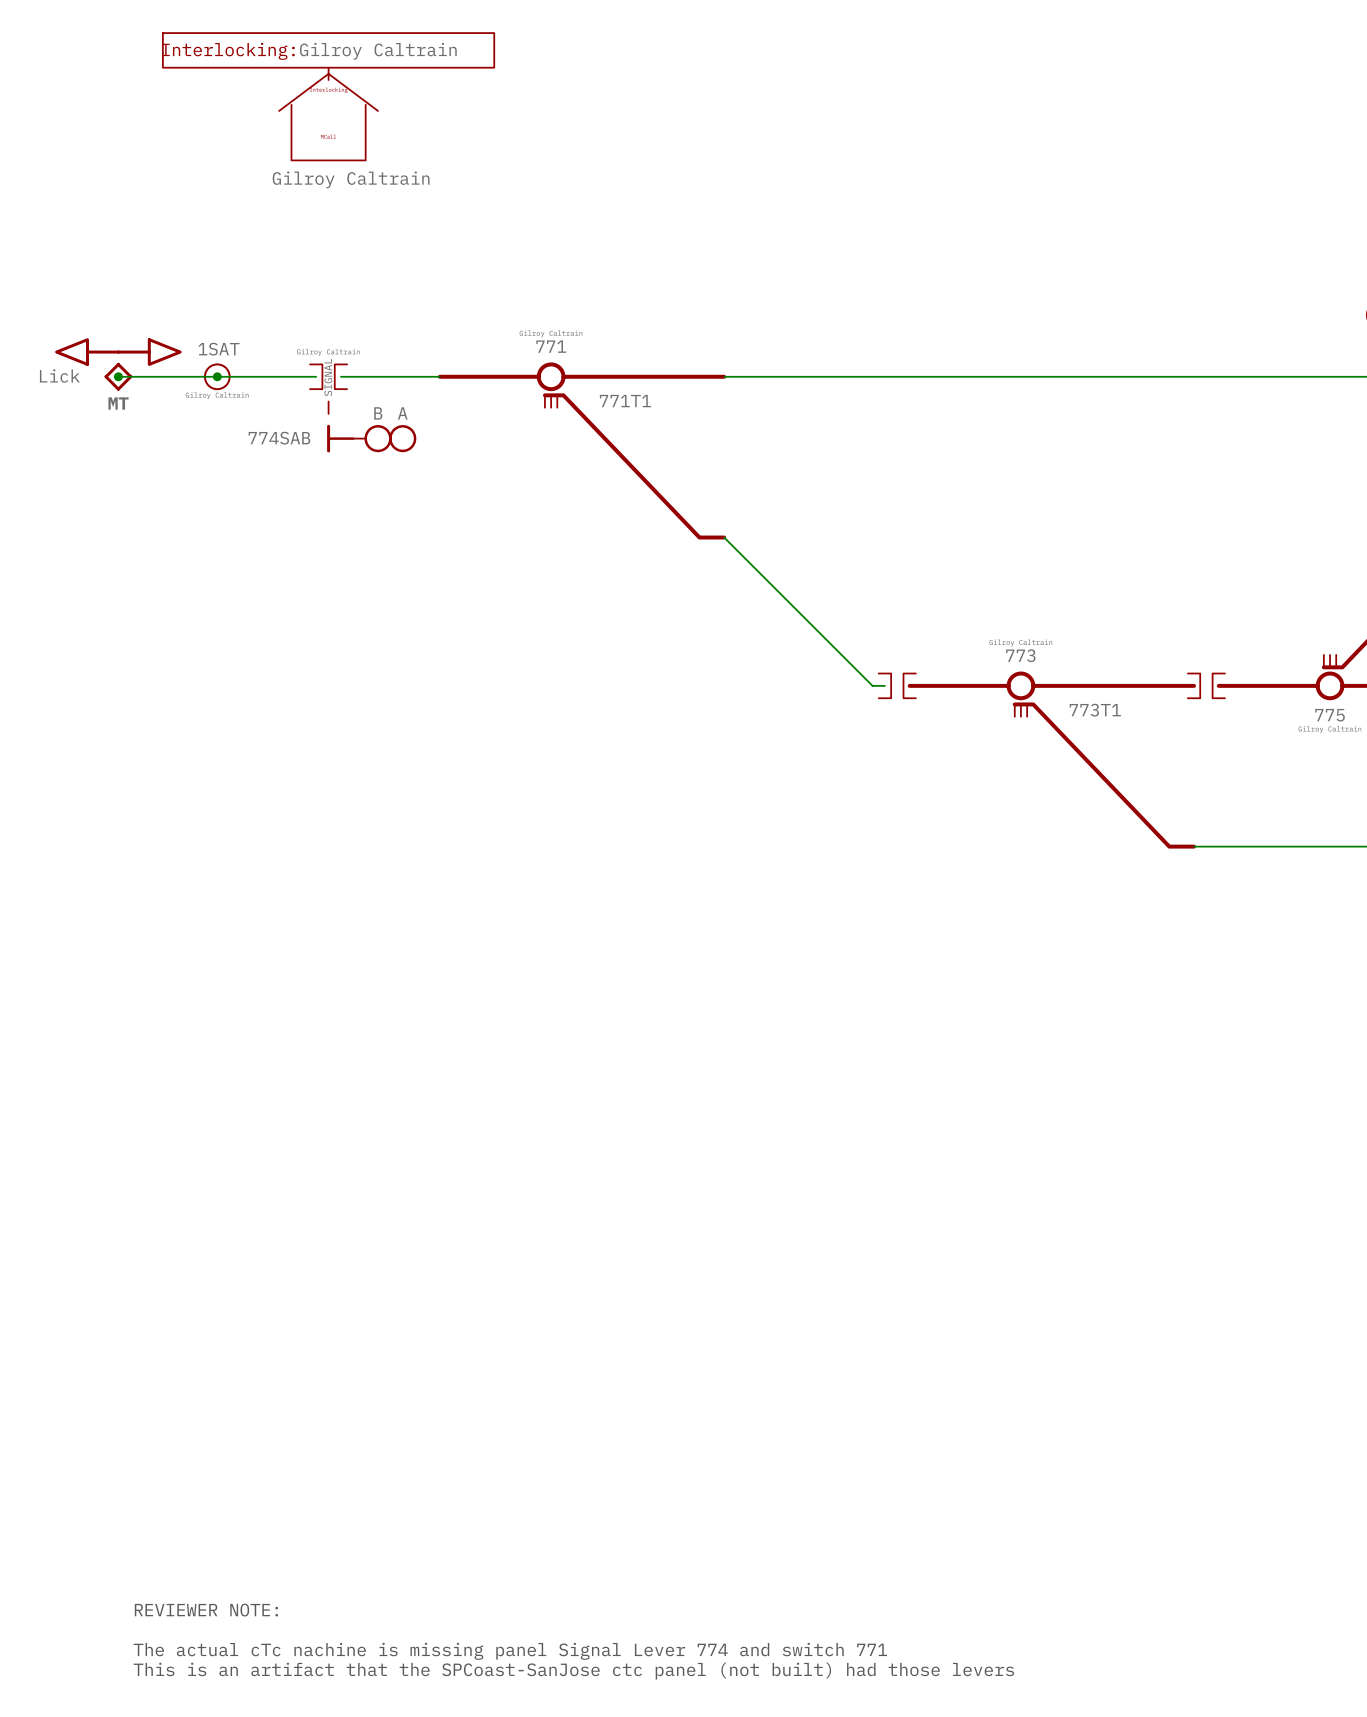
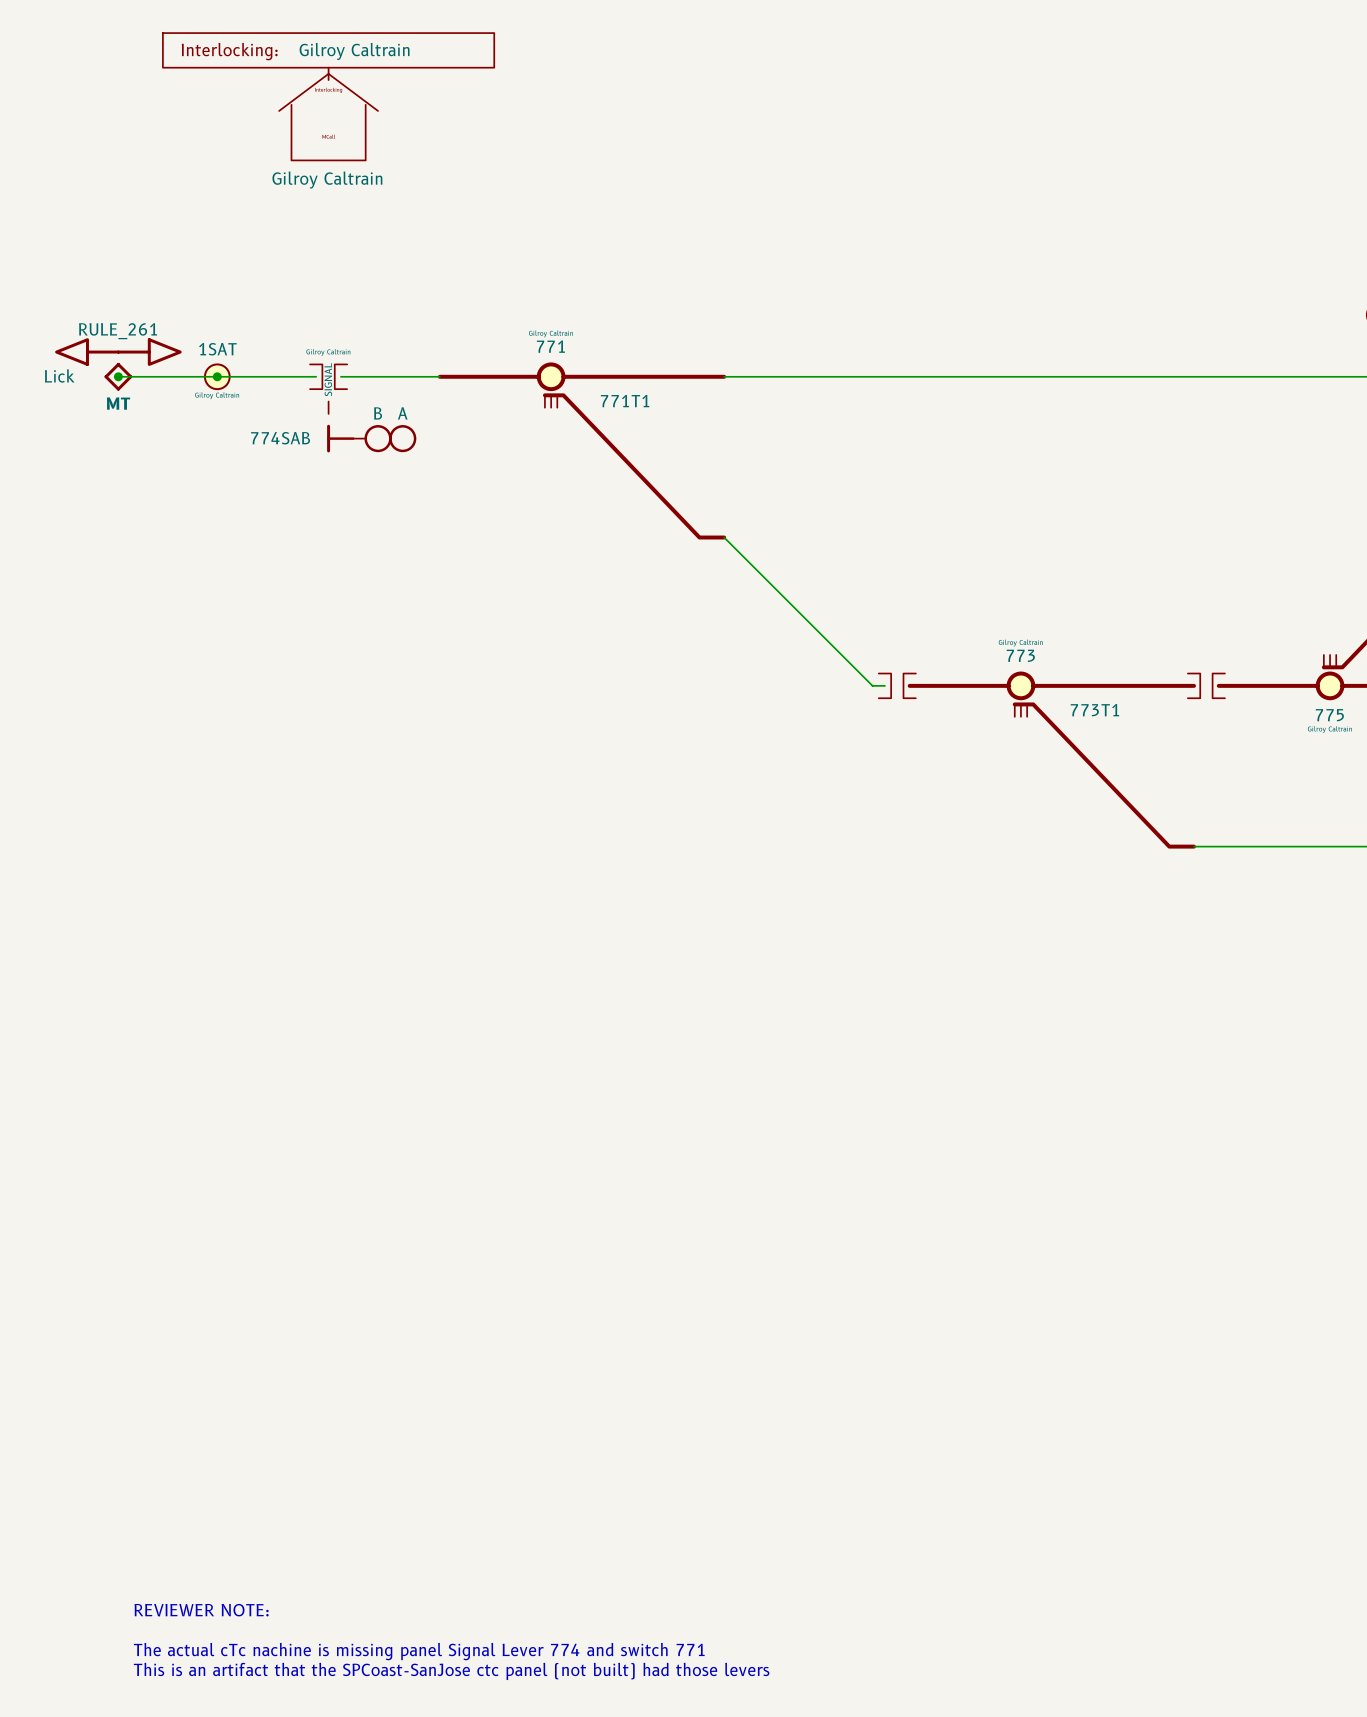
part text: none -> RULE_261 (118, 331)

